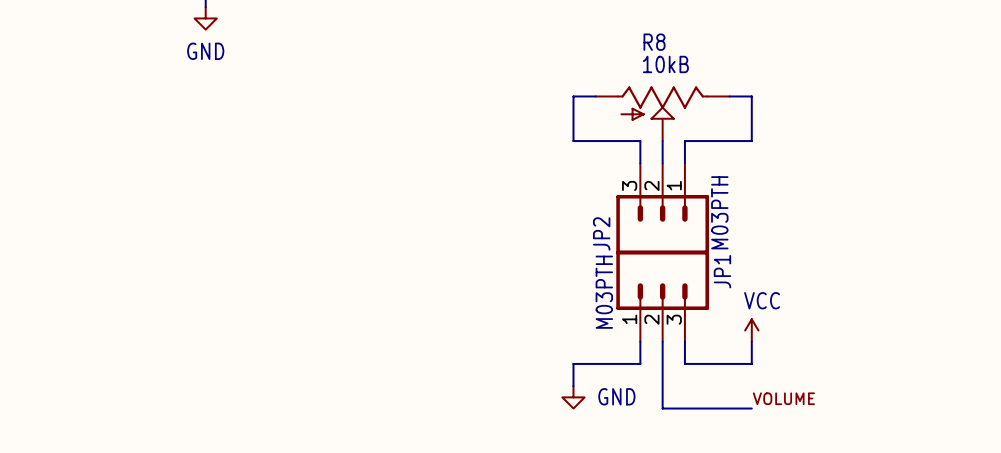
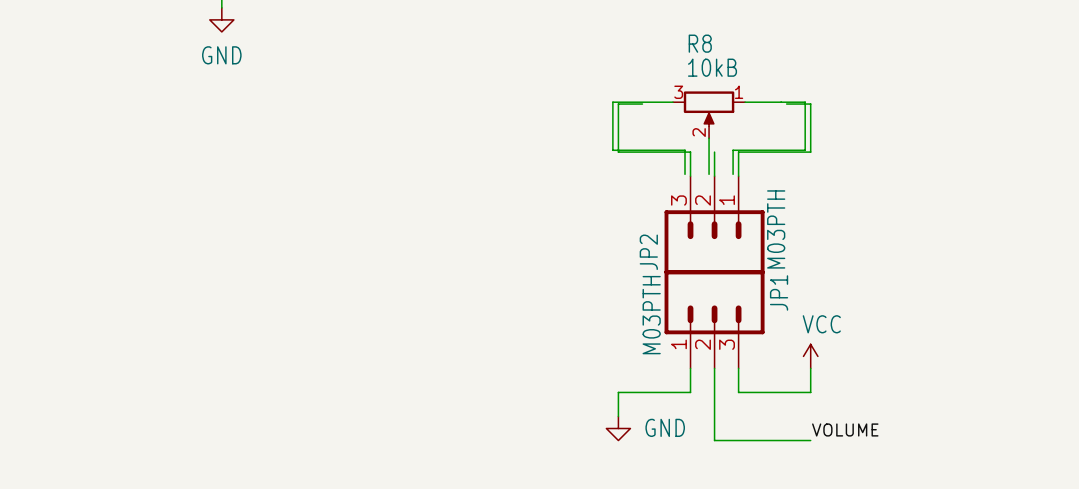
R8 symbol: [595, 86, 730, 142] -> [672, 91, 746, 139]
wire: none -> (672, 102) (612, 102) (612, 150) (685, 150) (685, 174)
wire: none -> (745, 102) (805, 102) (805, 150) (733, 150) (733, 174)
wire: none -> (709, 138) (709, 174)

